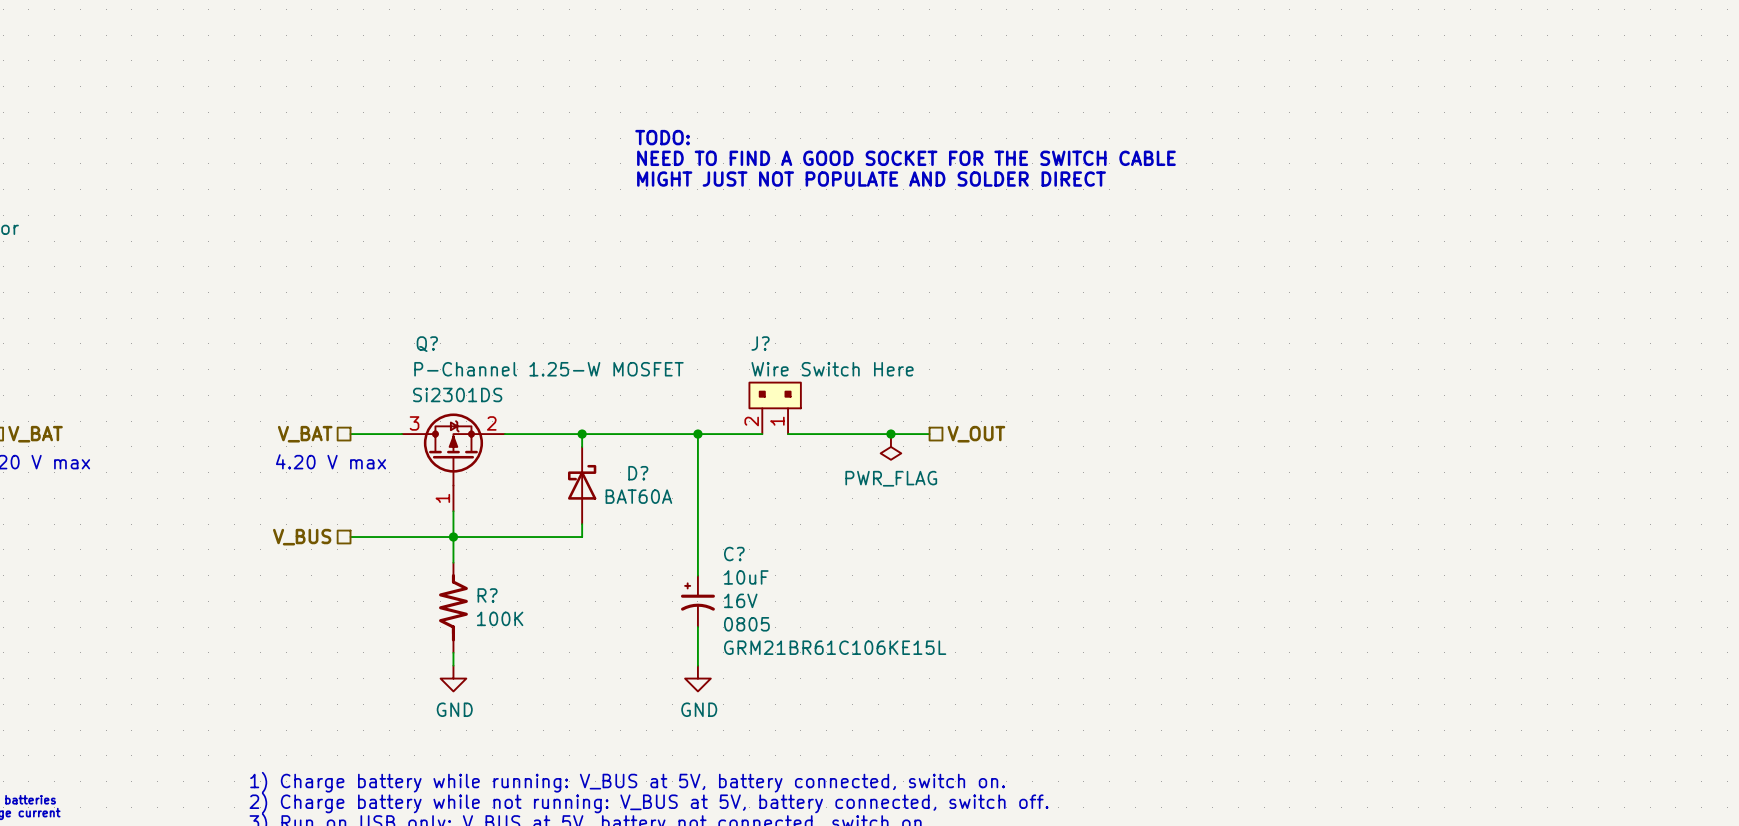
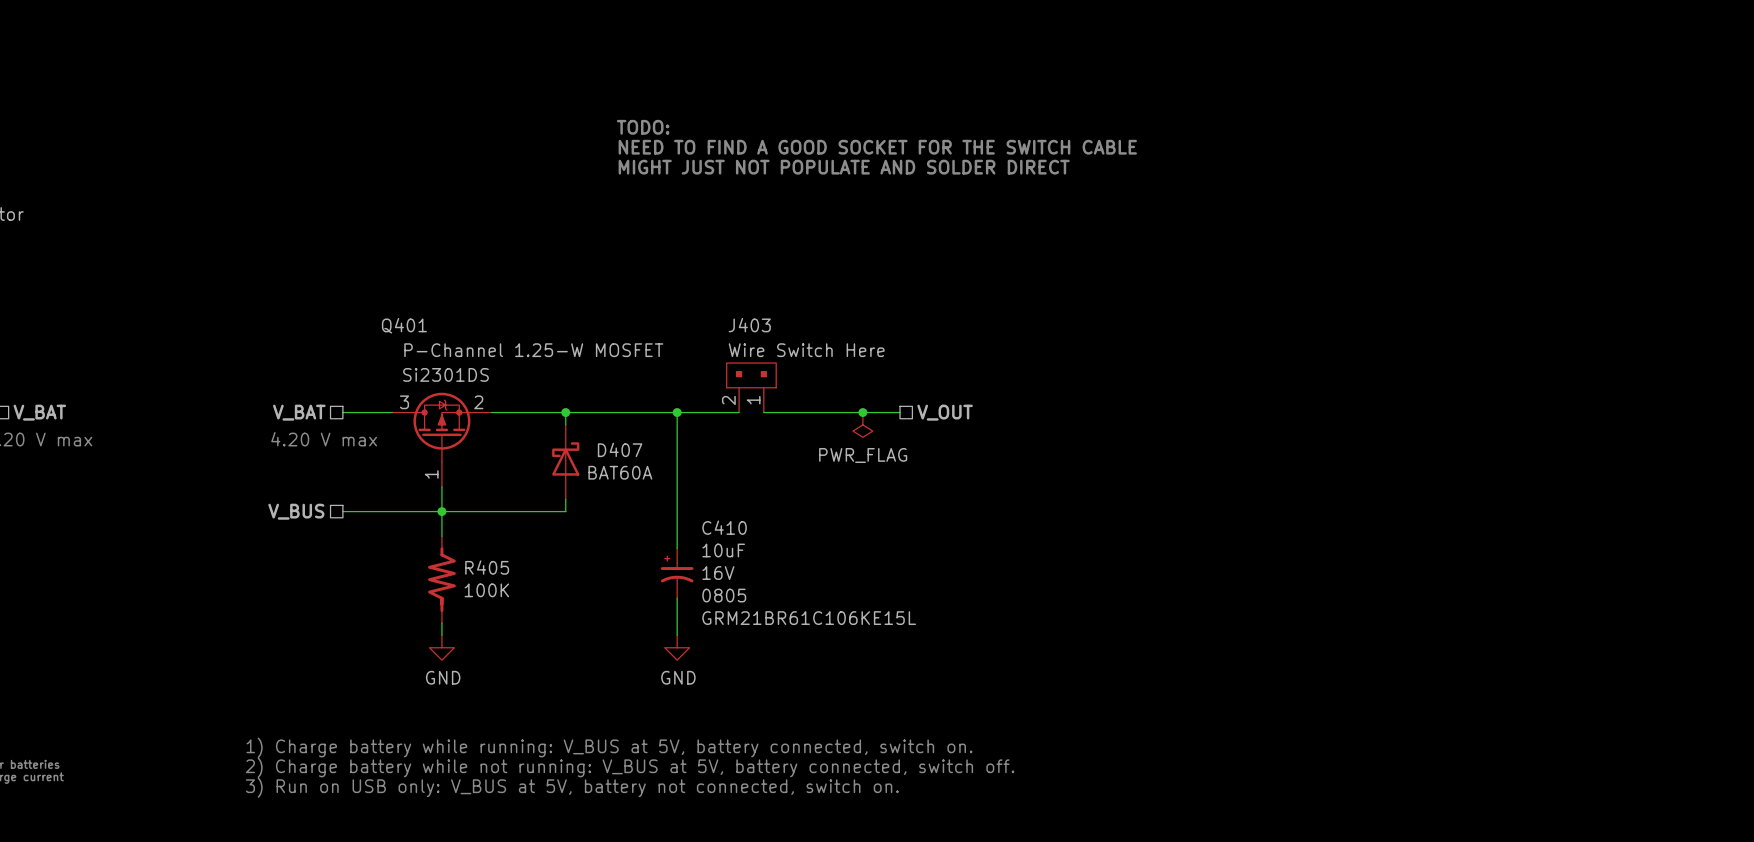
J? name: J? (760, 343) -> J403 (749, 325)
Q? name: Q? (427, 344) -> Q401 (404, 325)
D? name: D? (638, 473) -> D407 (620, 449)
C? name: C? (734, 554) -> C410 (724, 527)
R? name: R? (487, 595) -> R405 (487, 567)

